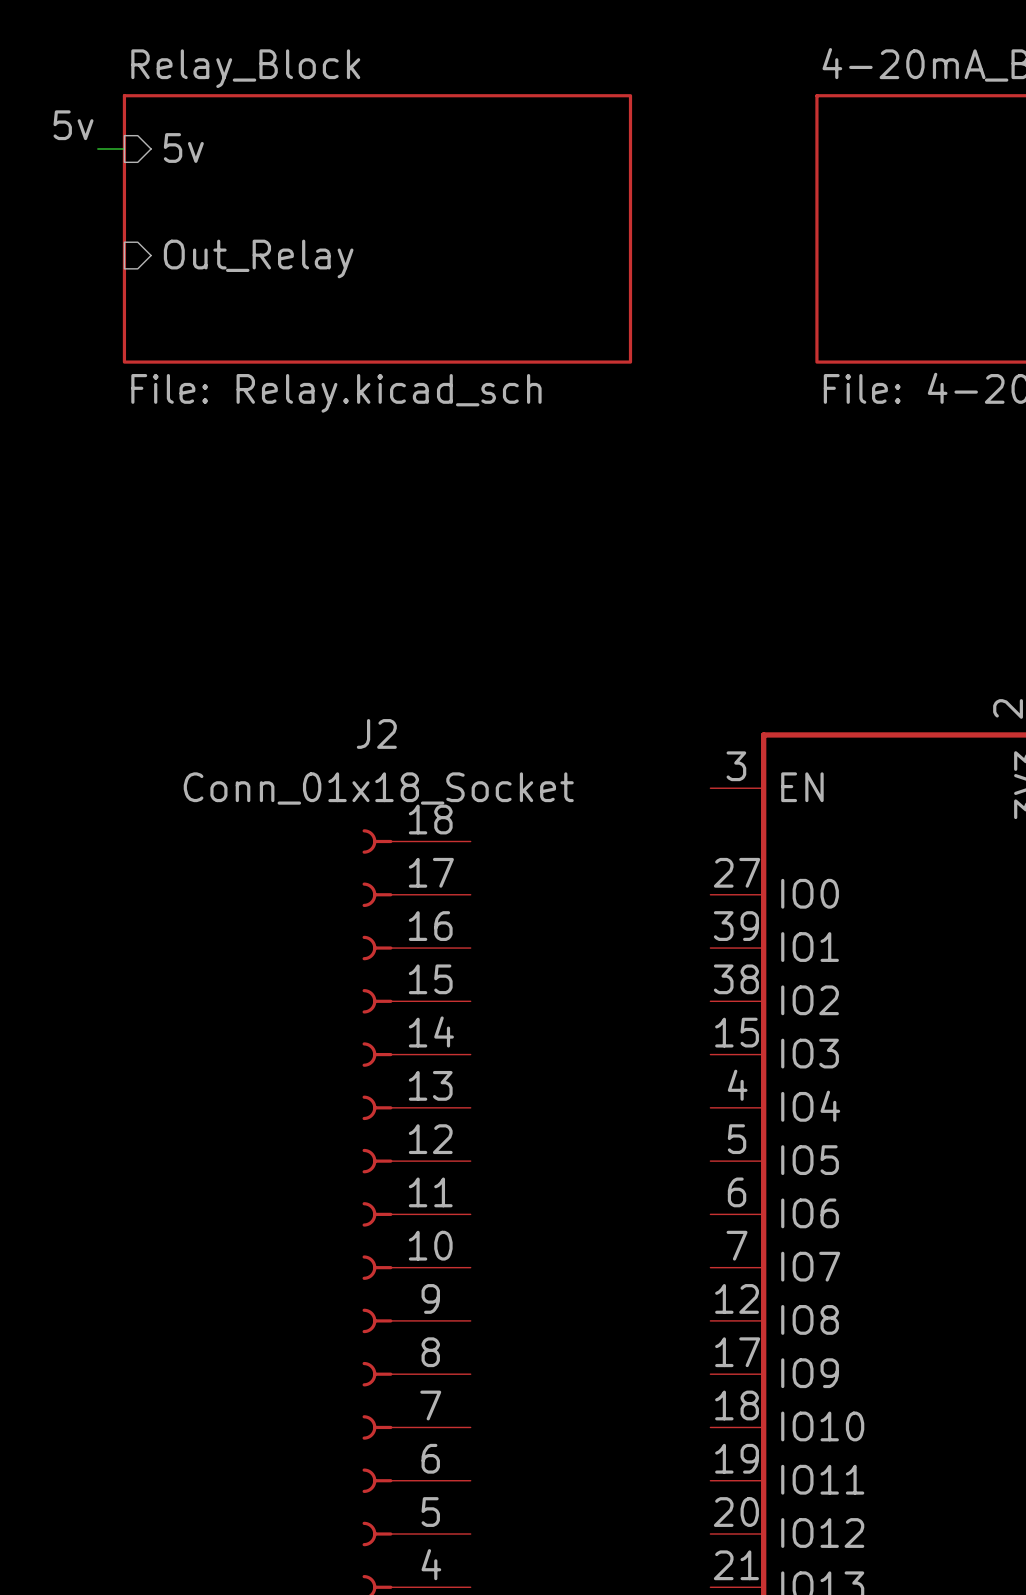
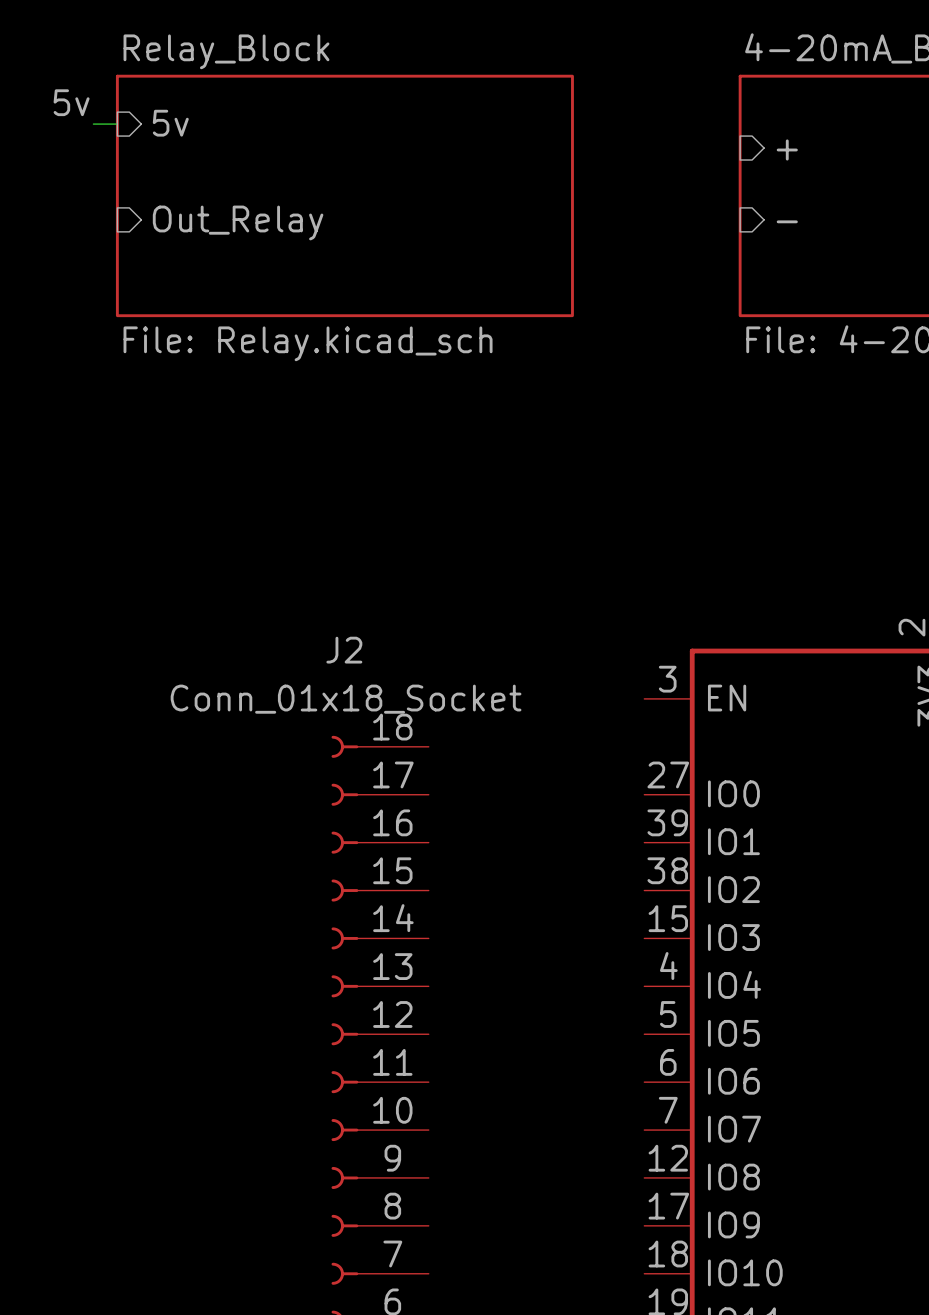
sheet pin: none -> + (787, 149)
sheet pin: none -> - (787, 221)

